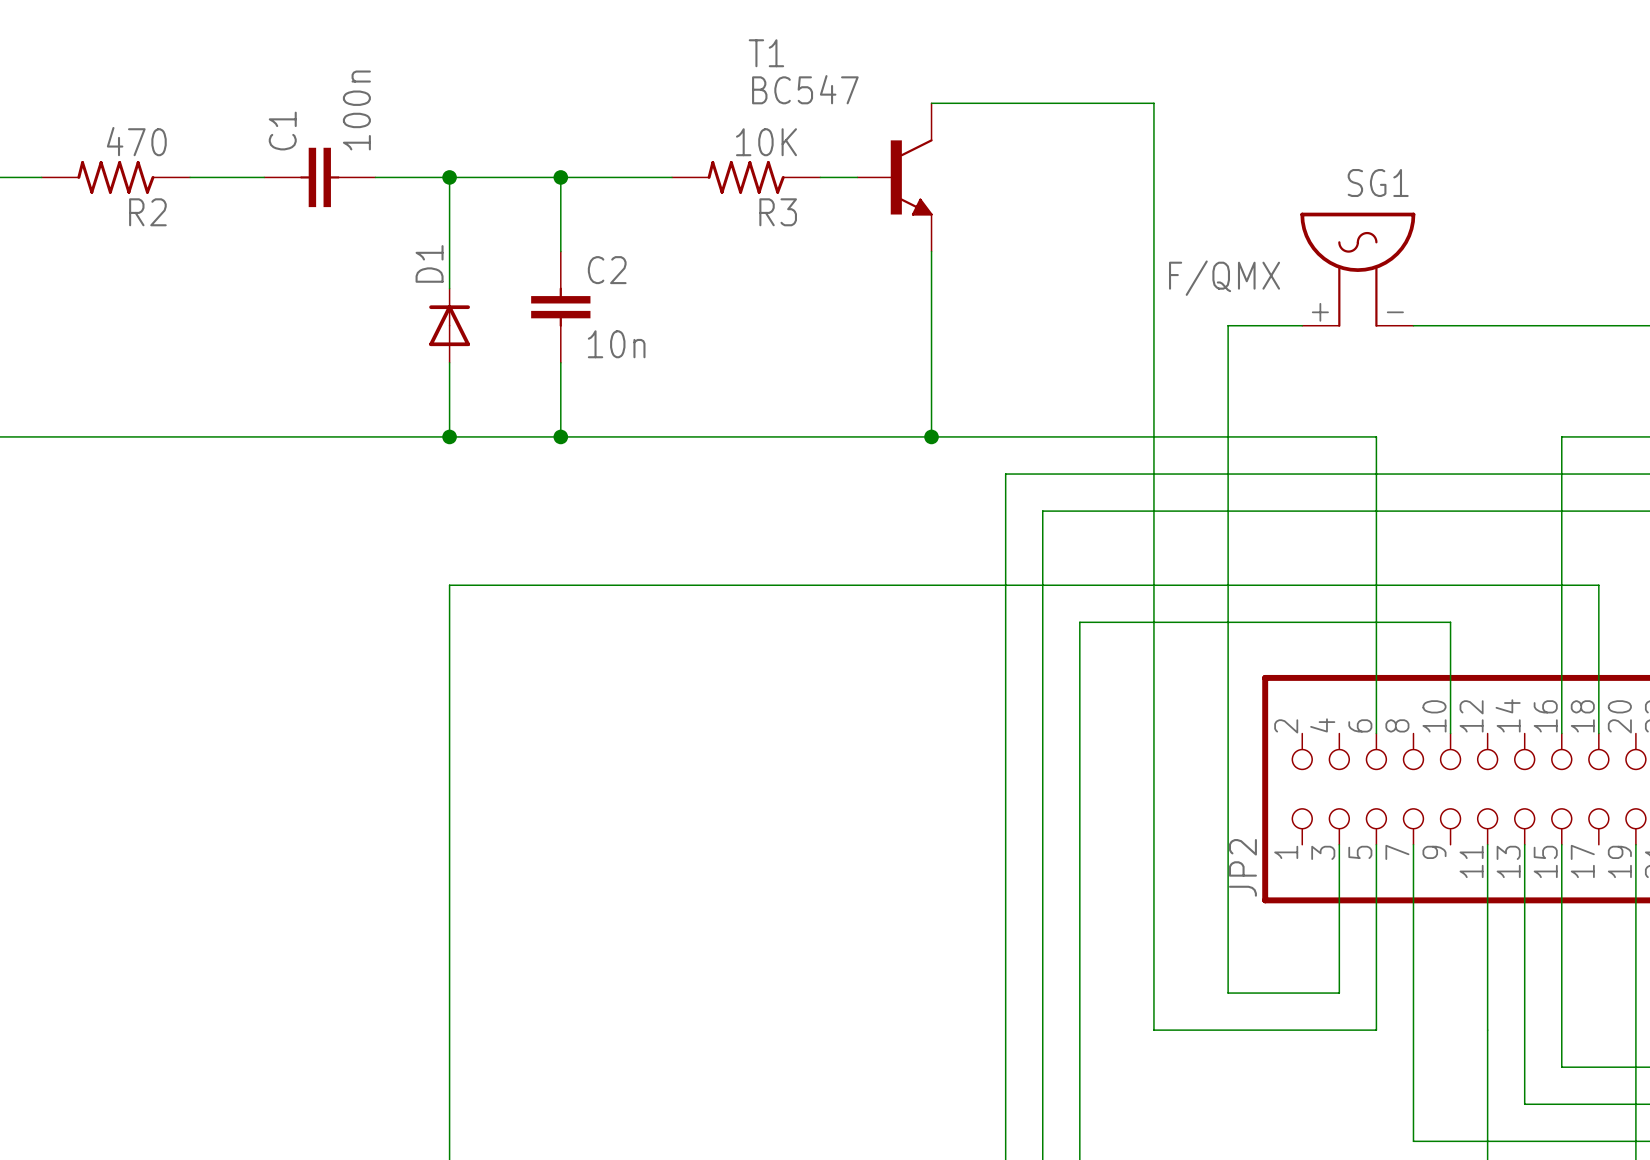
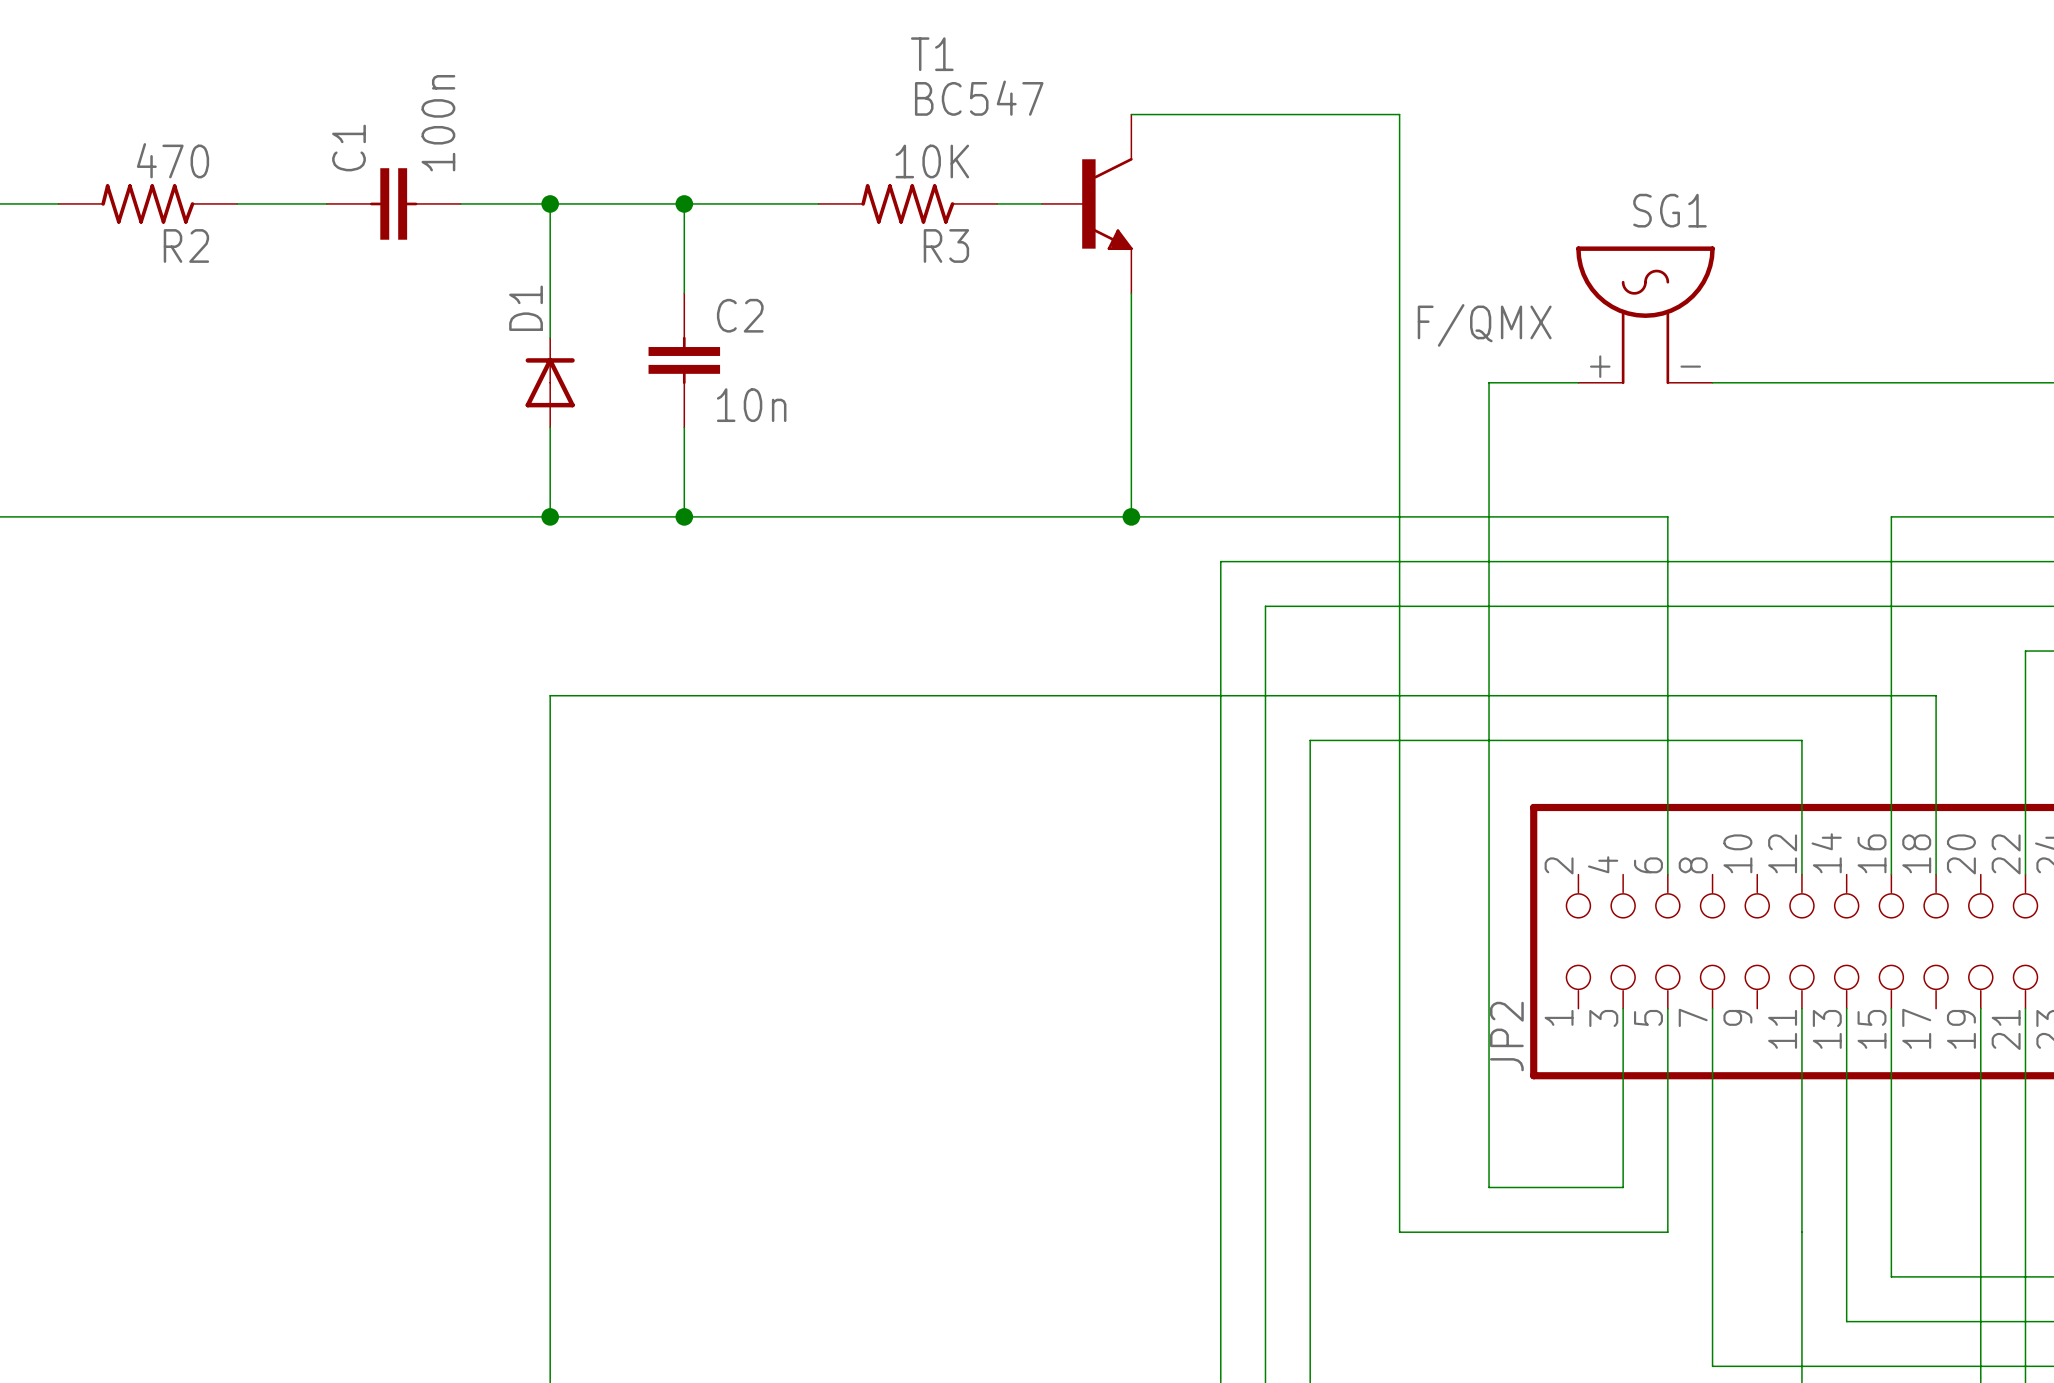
wire: (1450, 622) (1450, 733) -> (1757, 740) (1801, 740) (1801, 874)

